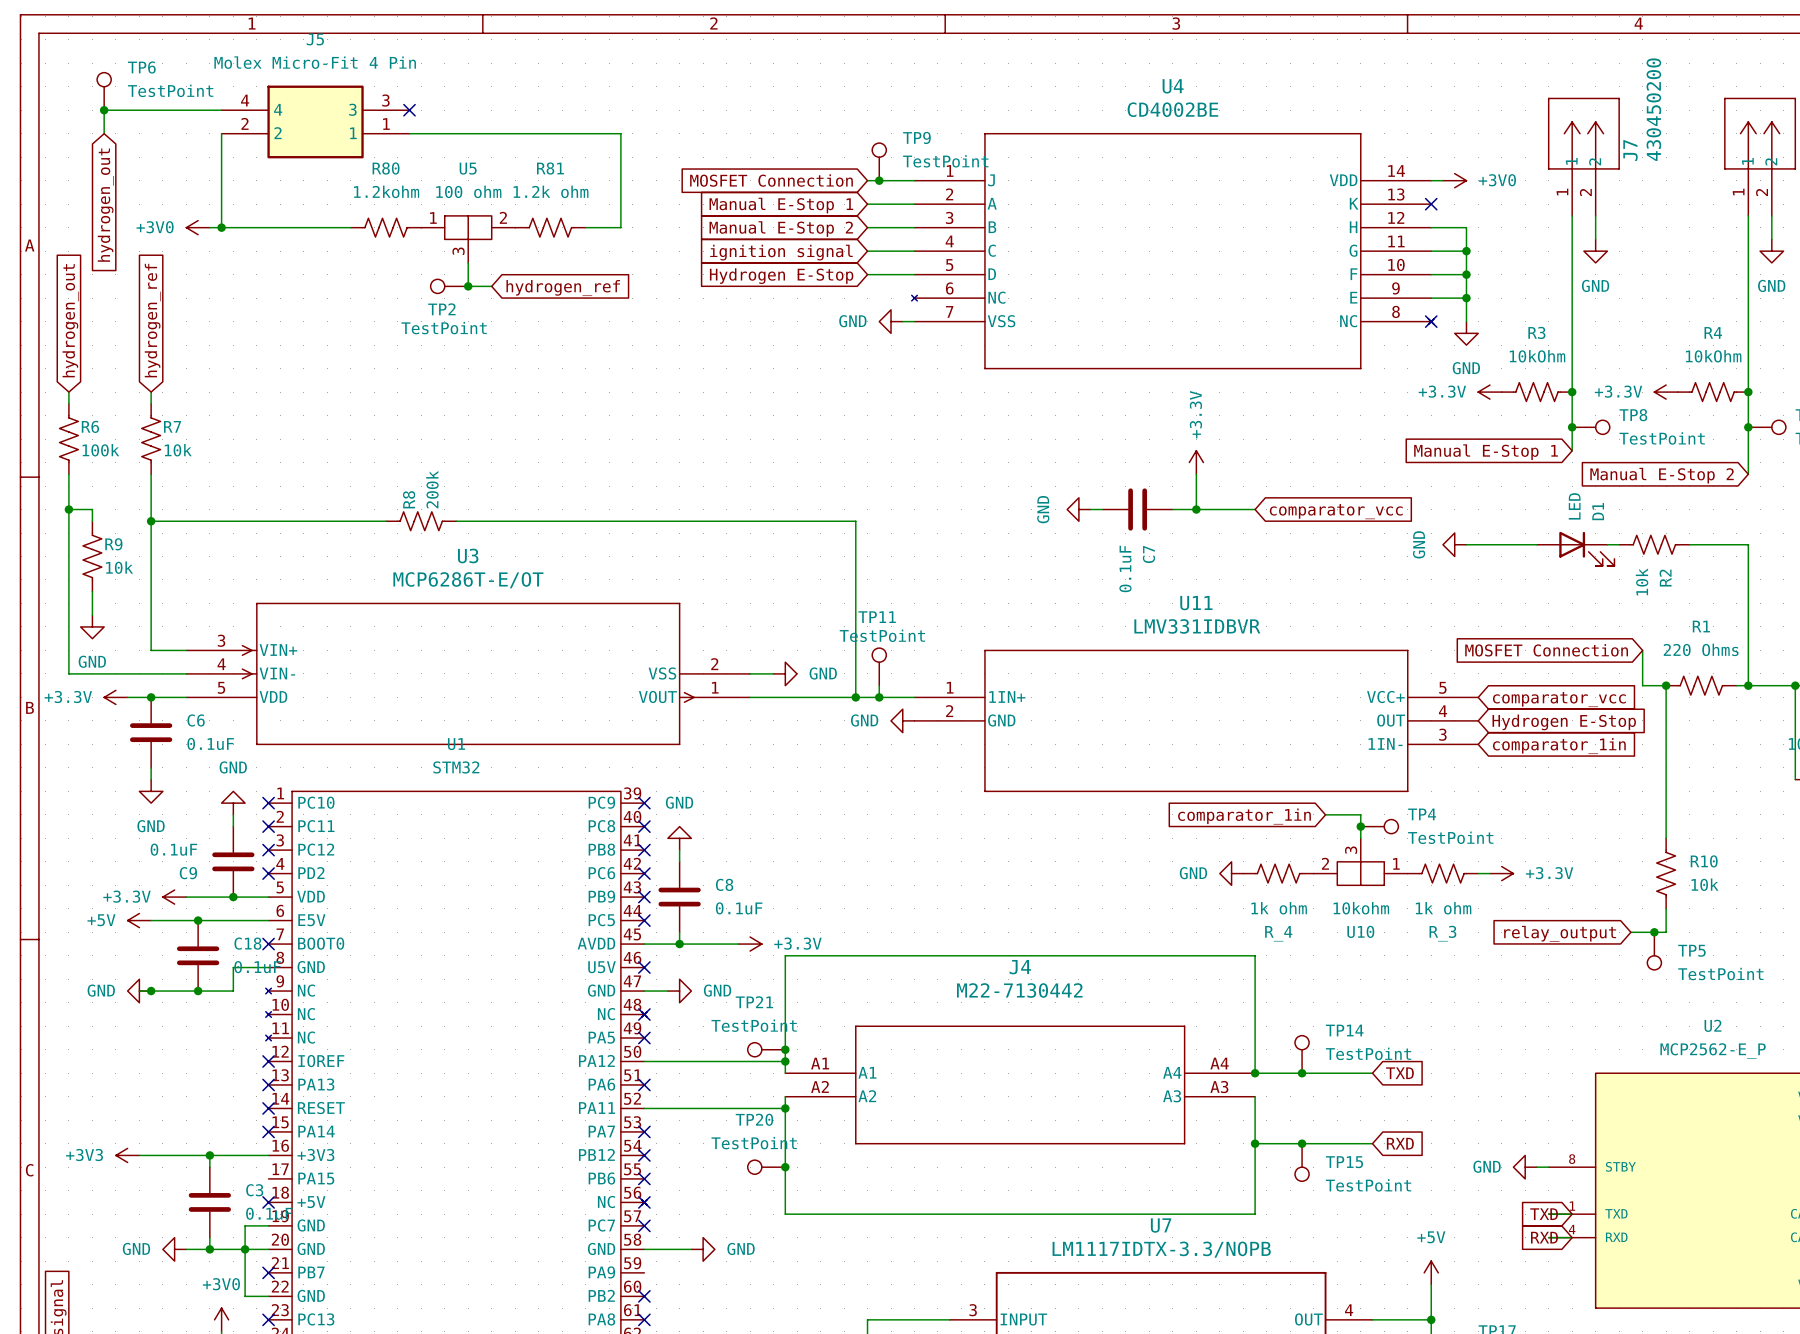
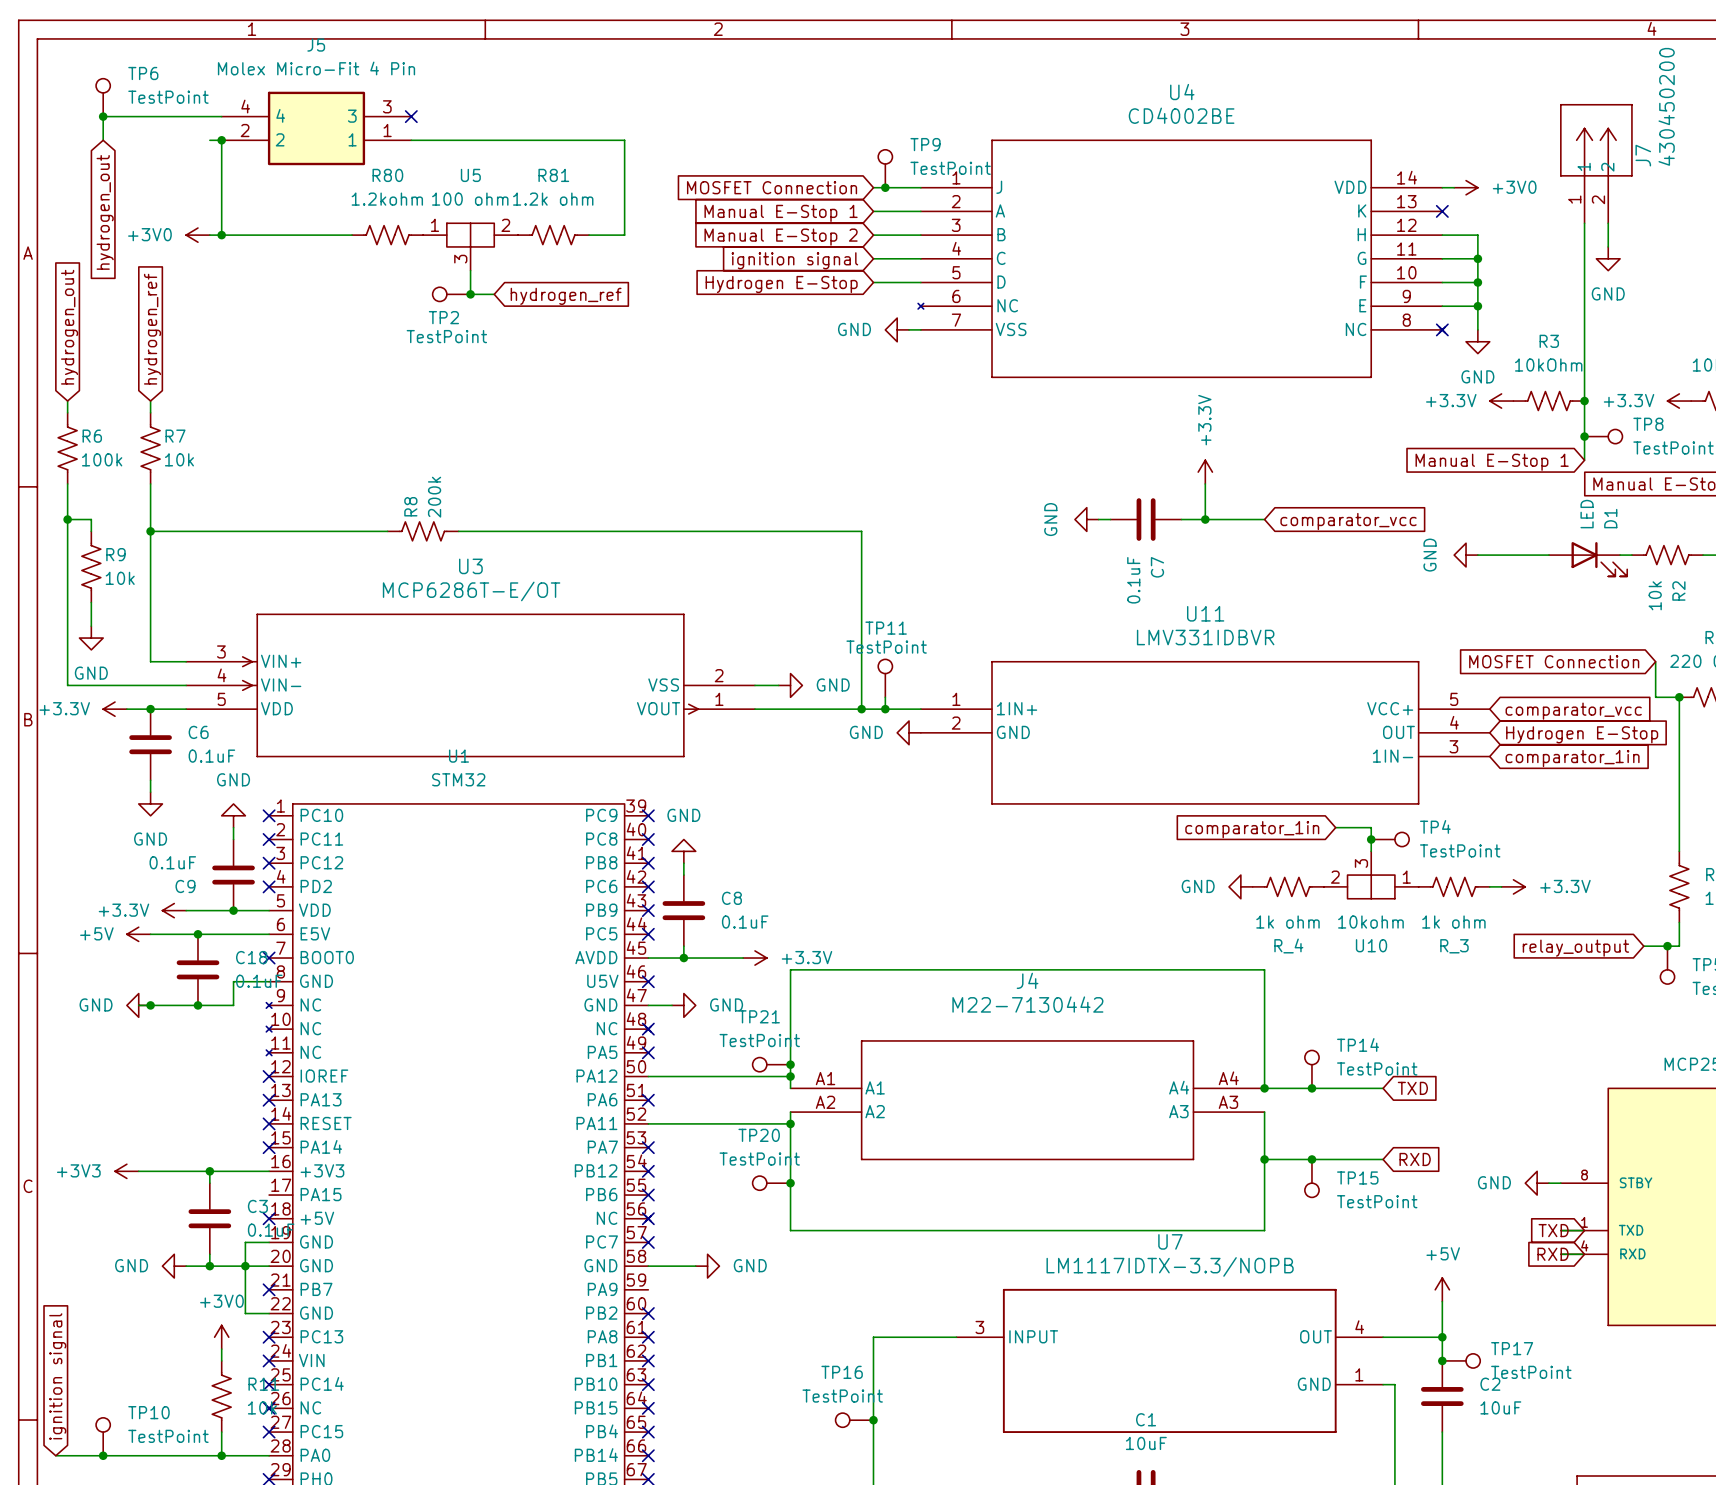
wire: none -> (209, 140) (221, 140)
junction: none -> (221, 140)

